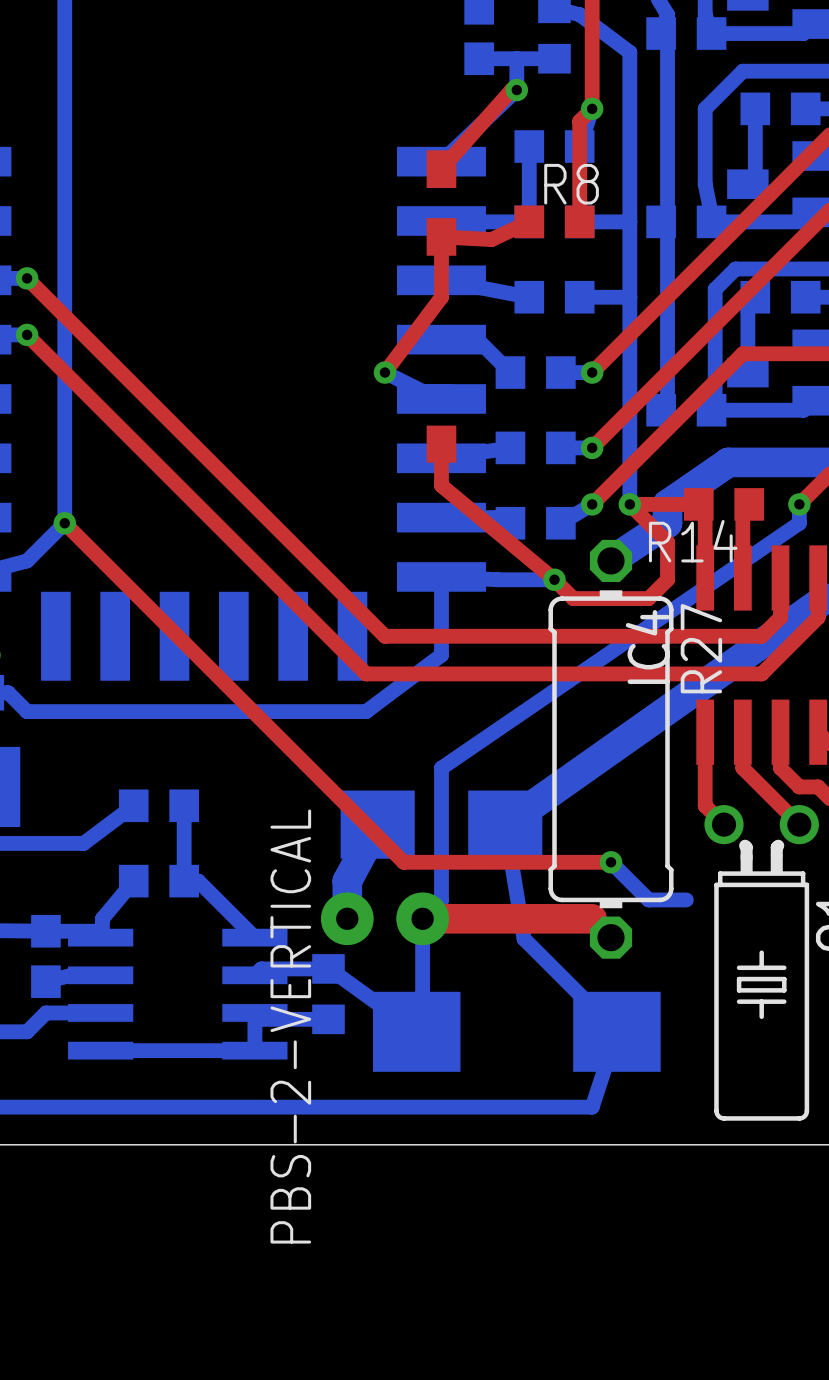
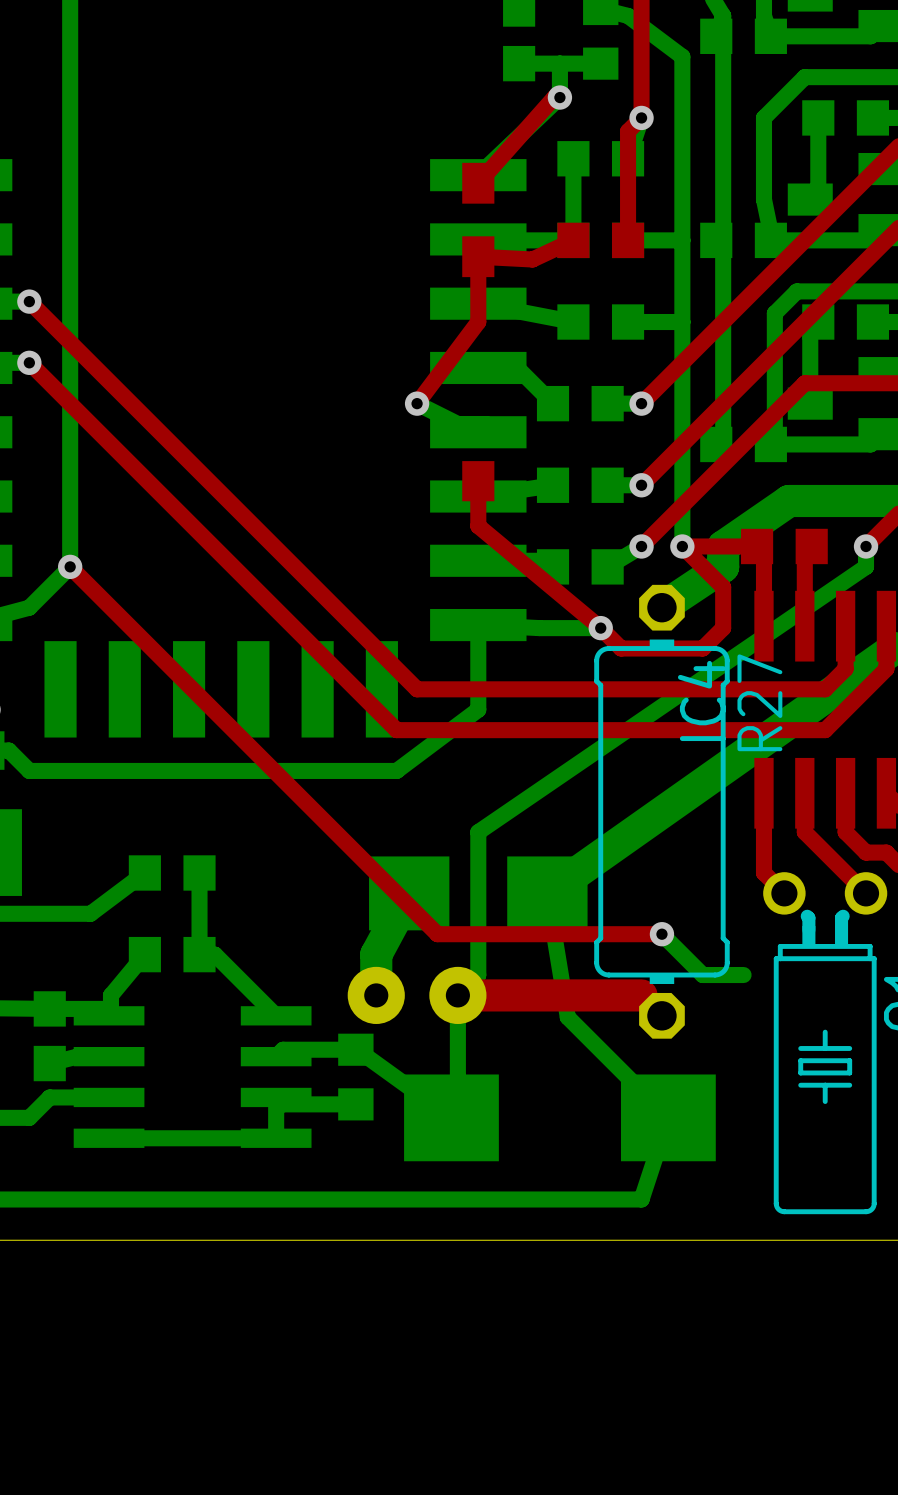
R8 name: R8 (571, 184) -> none
R14 name: R14 (693, 541) -> none
part value: PBS-2-VERTICAL (290, 1026) -> none

